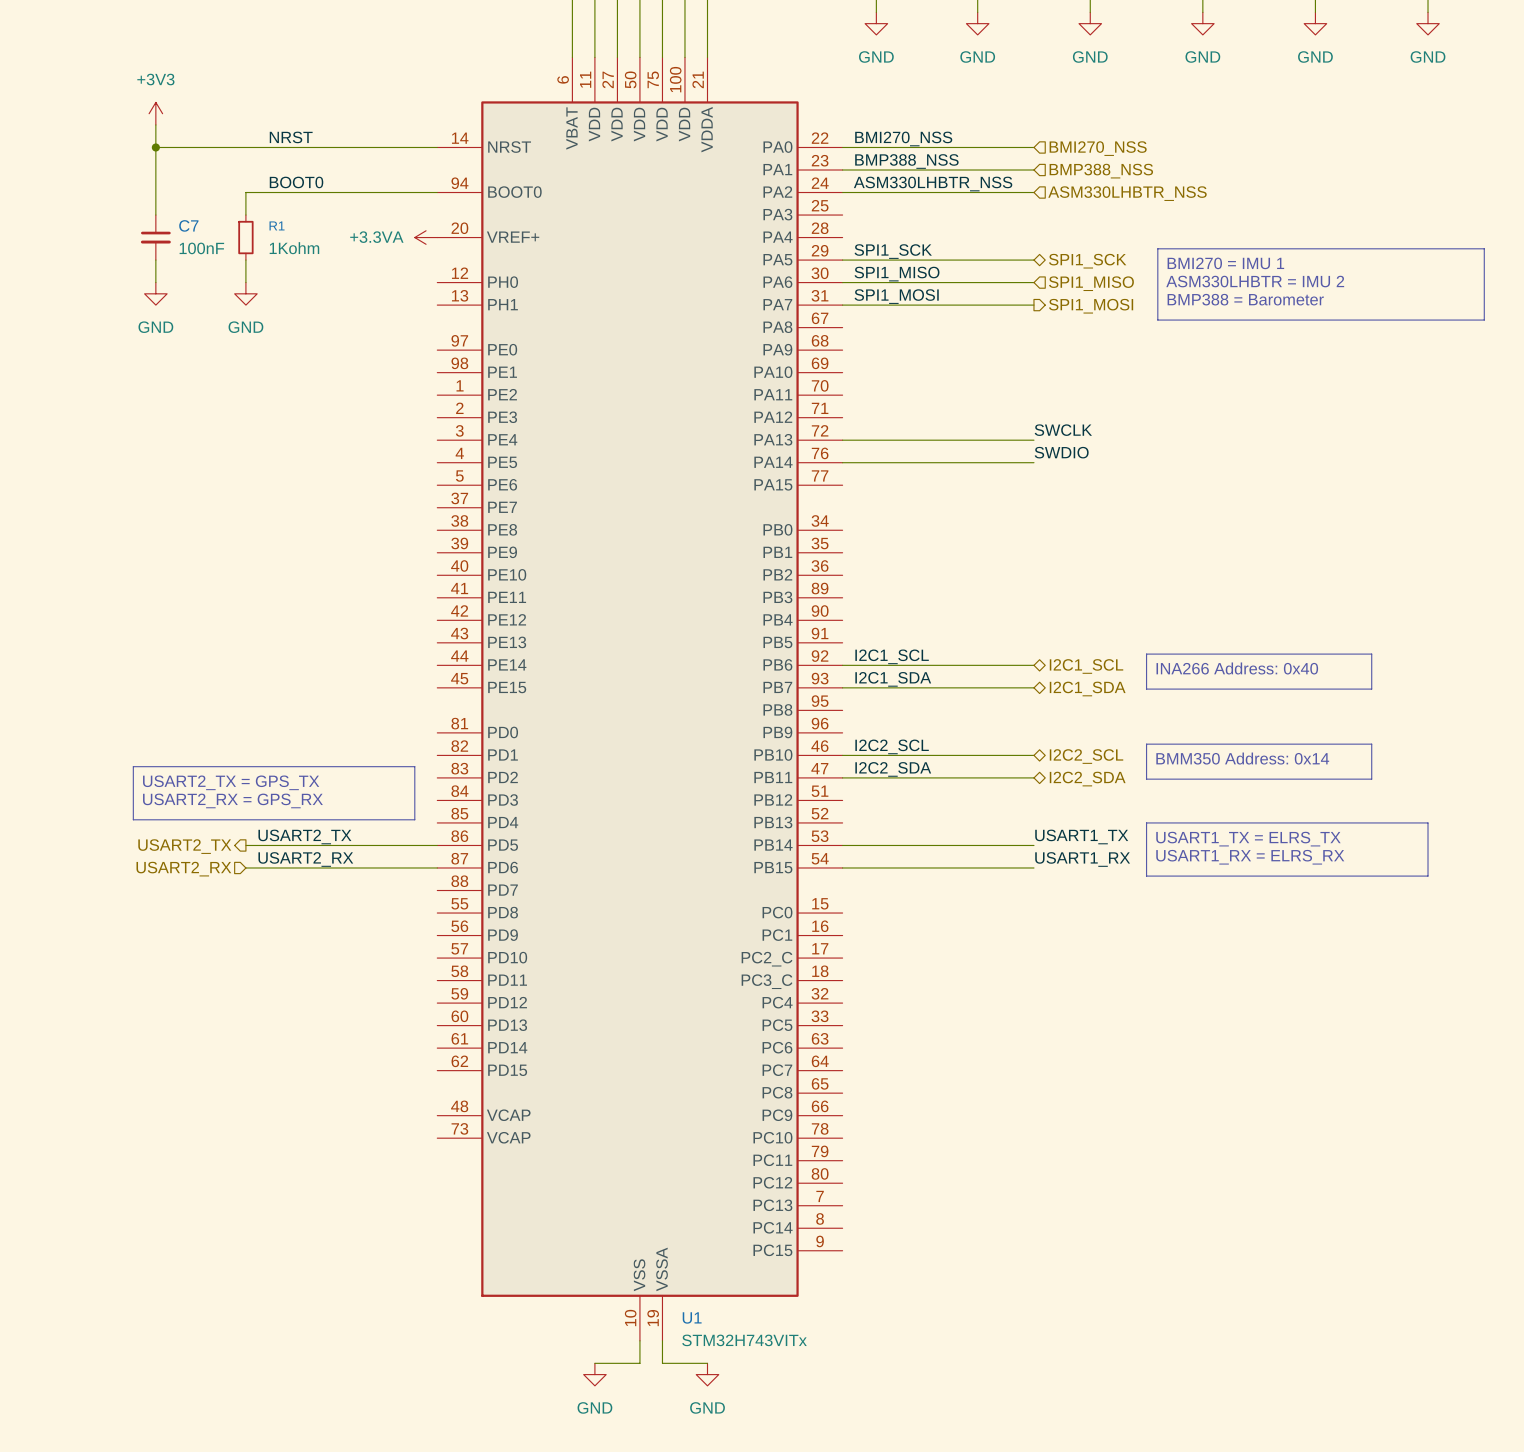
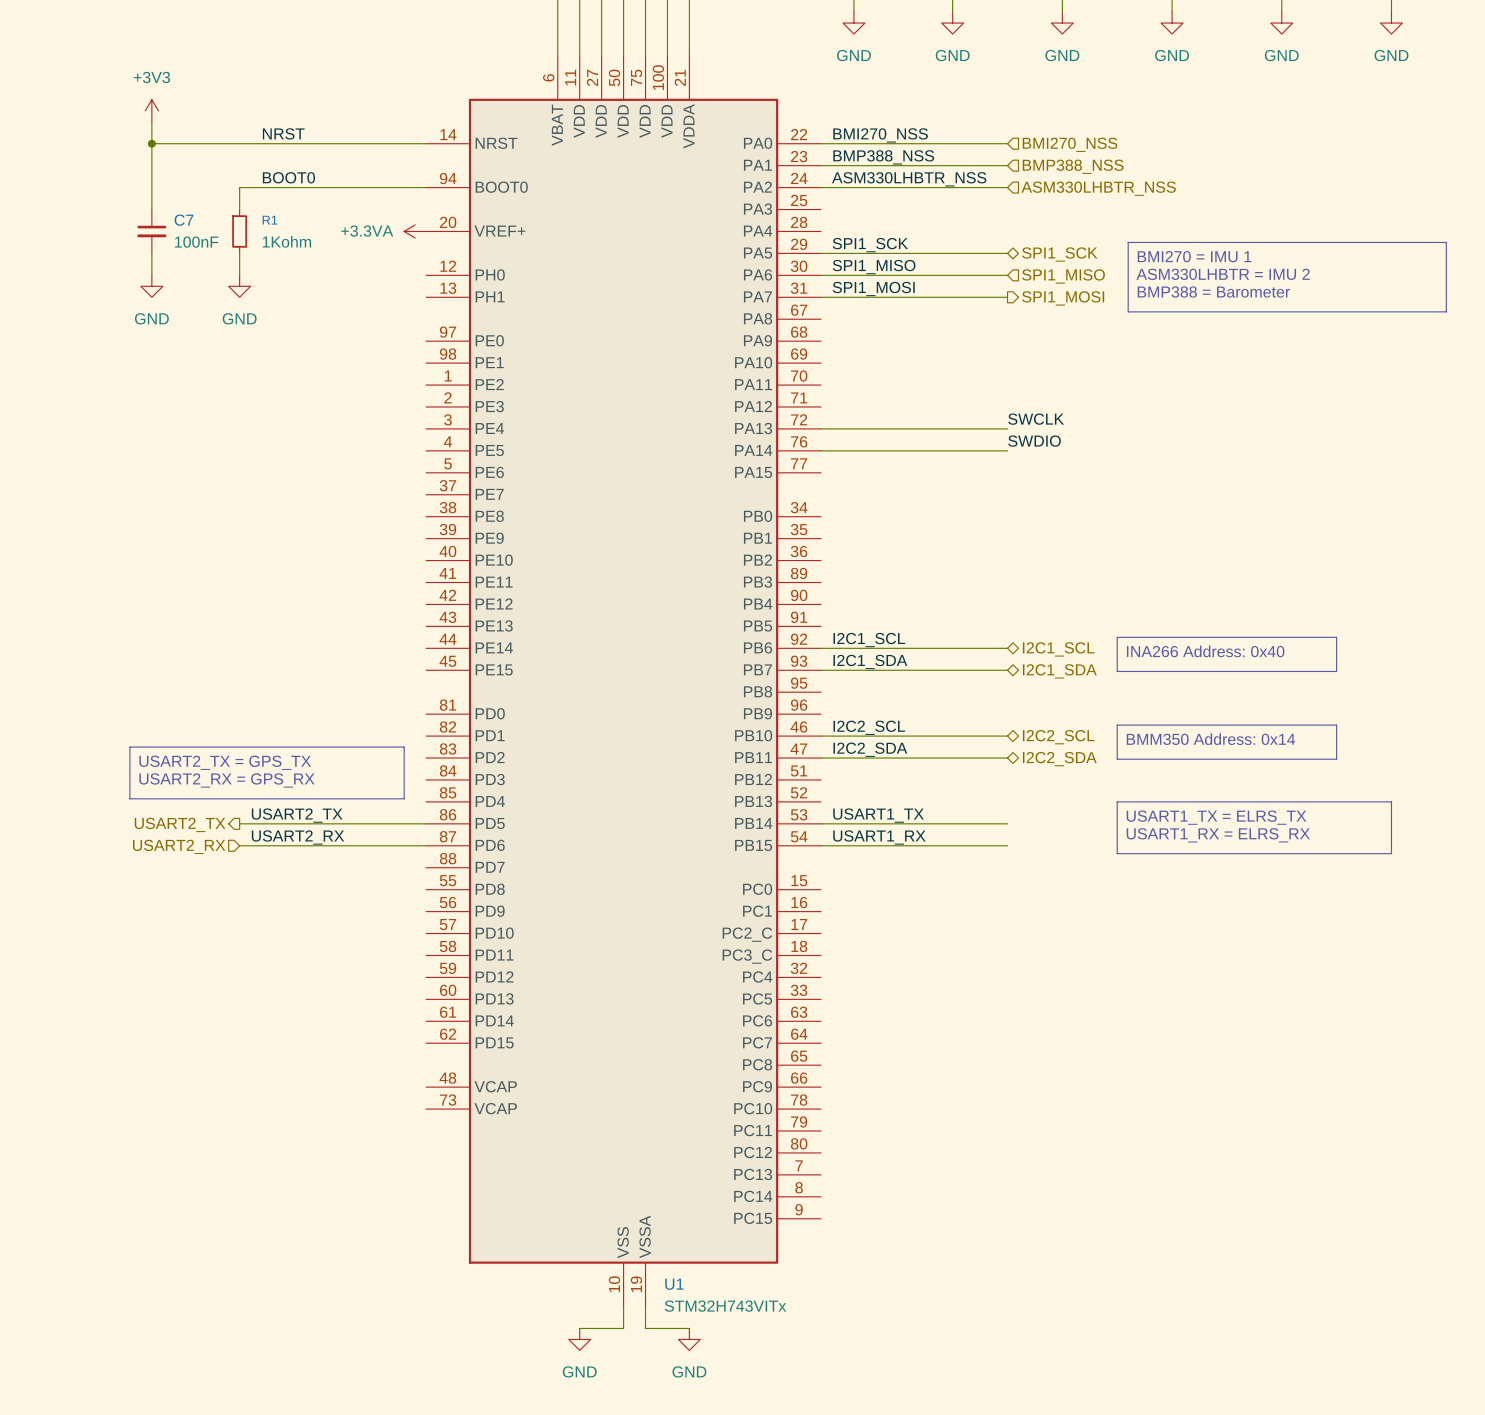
label position: USART1_TX (1081, 836) -> USART1_TX (878, 815)
label position: USART1_RX (1082, 859) -> USART1_RX (879, 837)

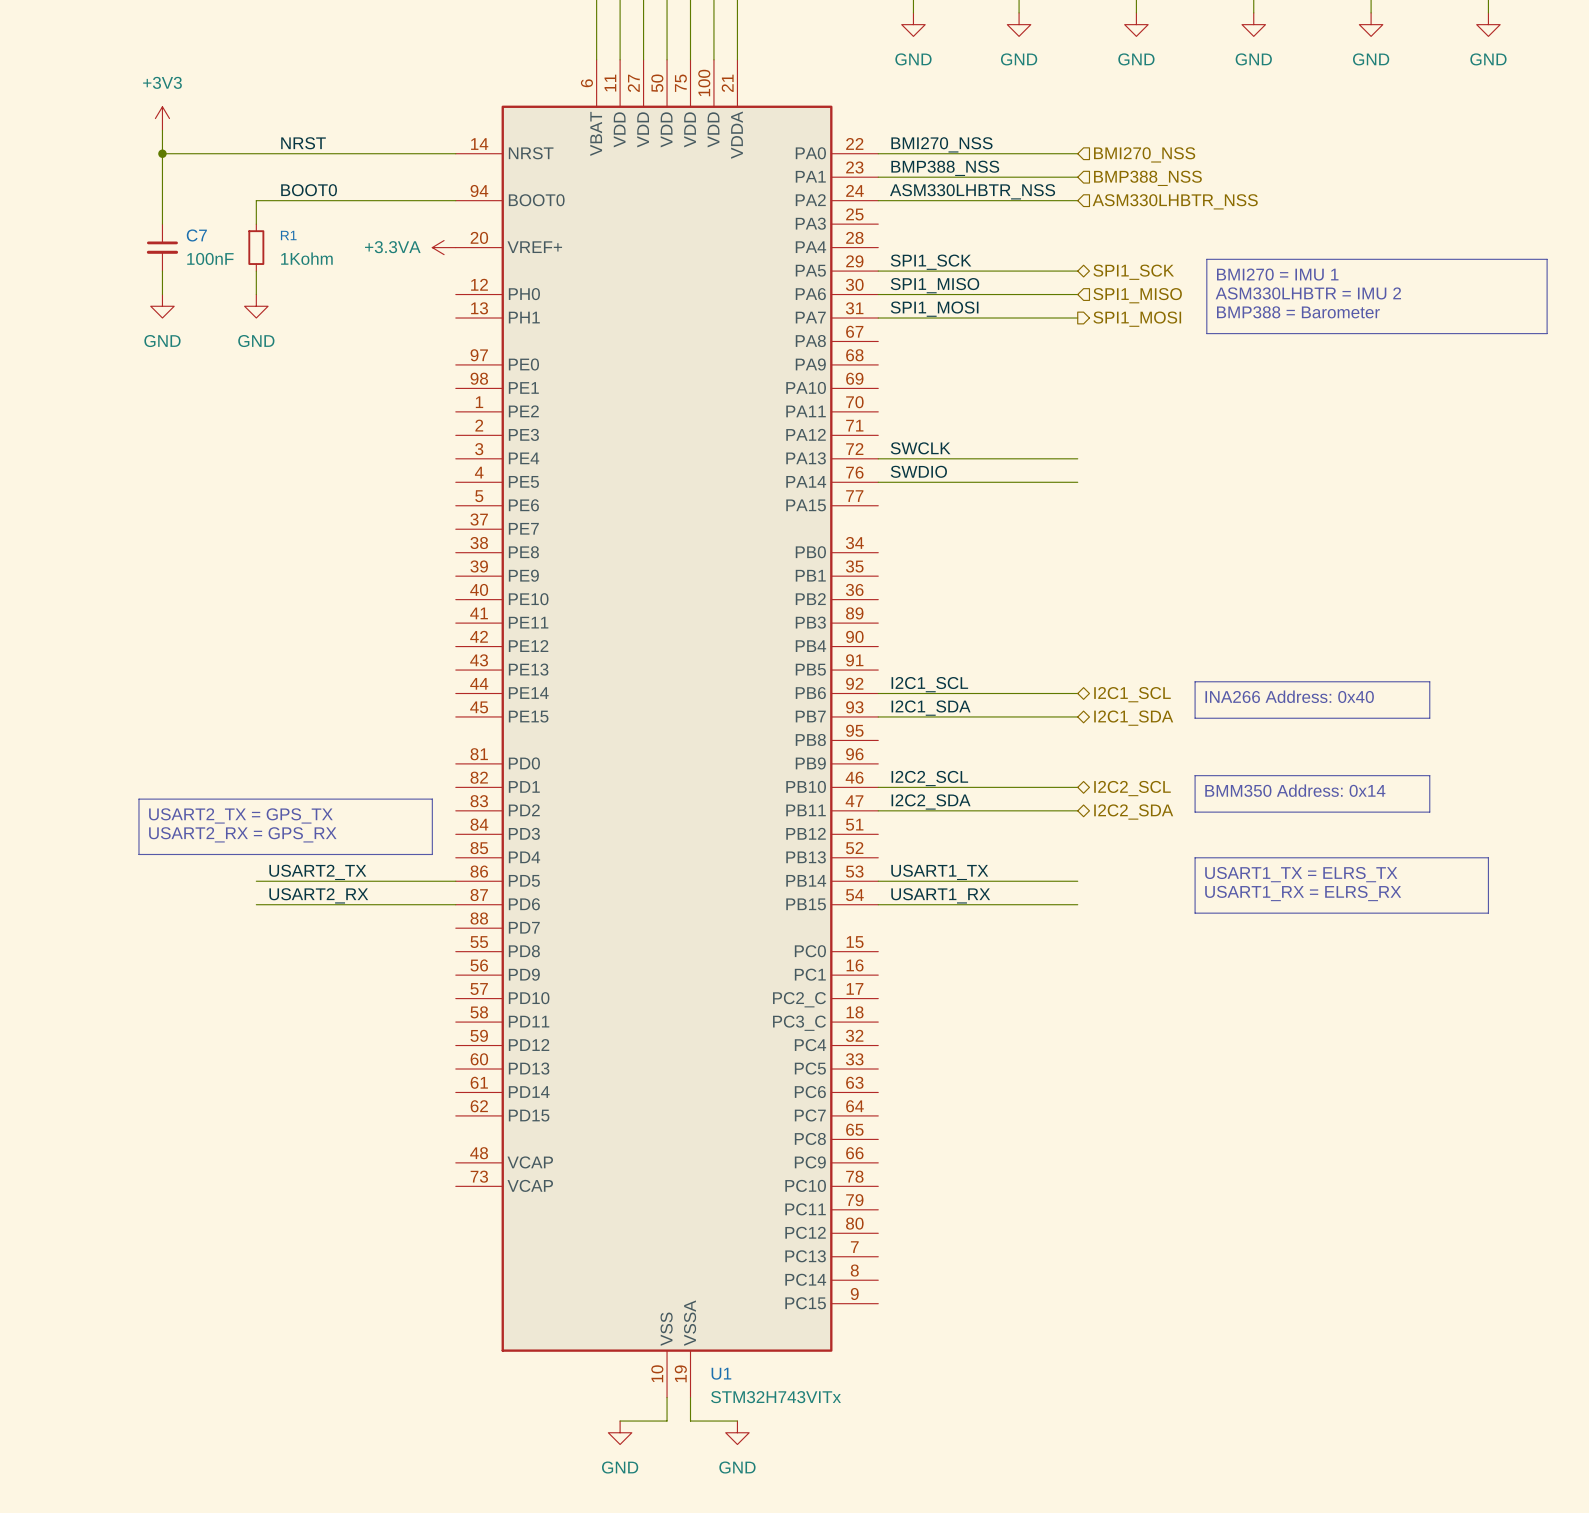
label position: SWCLK (1036, 419) -> SWCLK (920, 448)
label position: SWDIO (1034, 441) -> SWDIO (918, 471)
hierarchical label: USART2_TX (180, 824) -> none
hierarchical label: USART2_RX (179, 846) -> none

